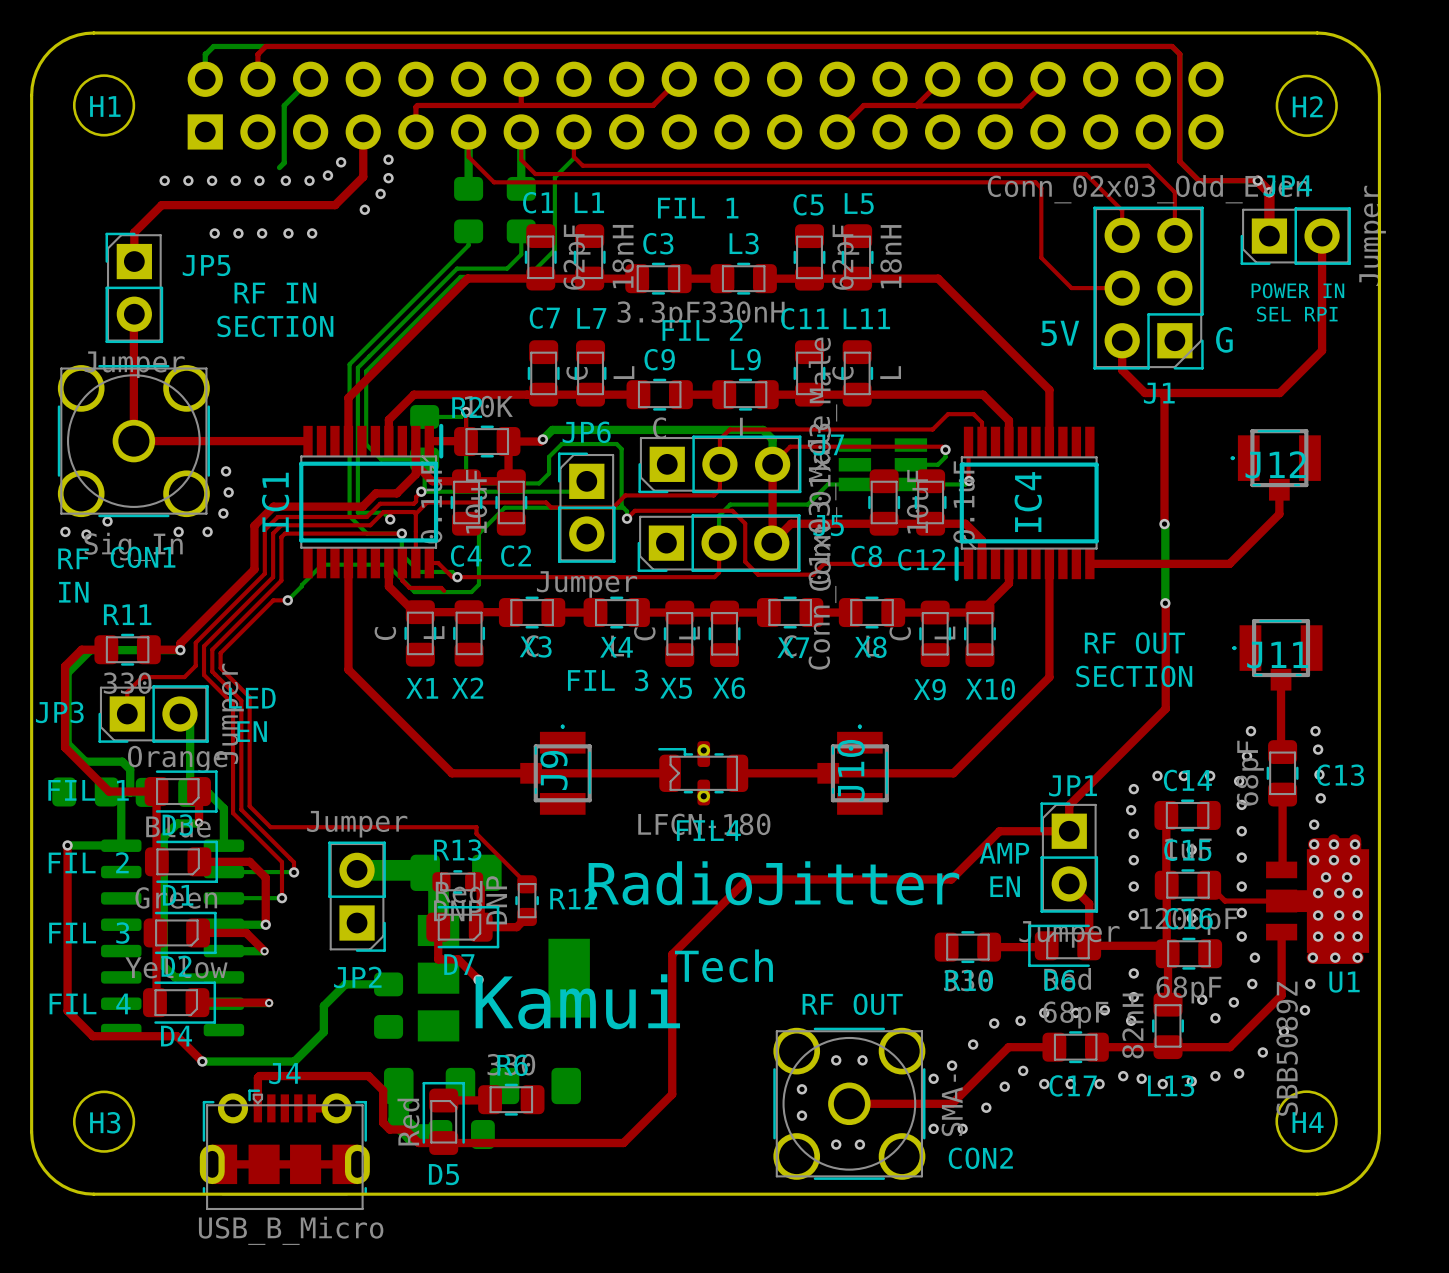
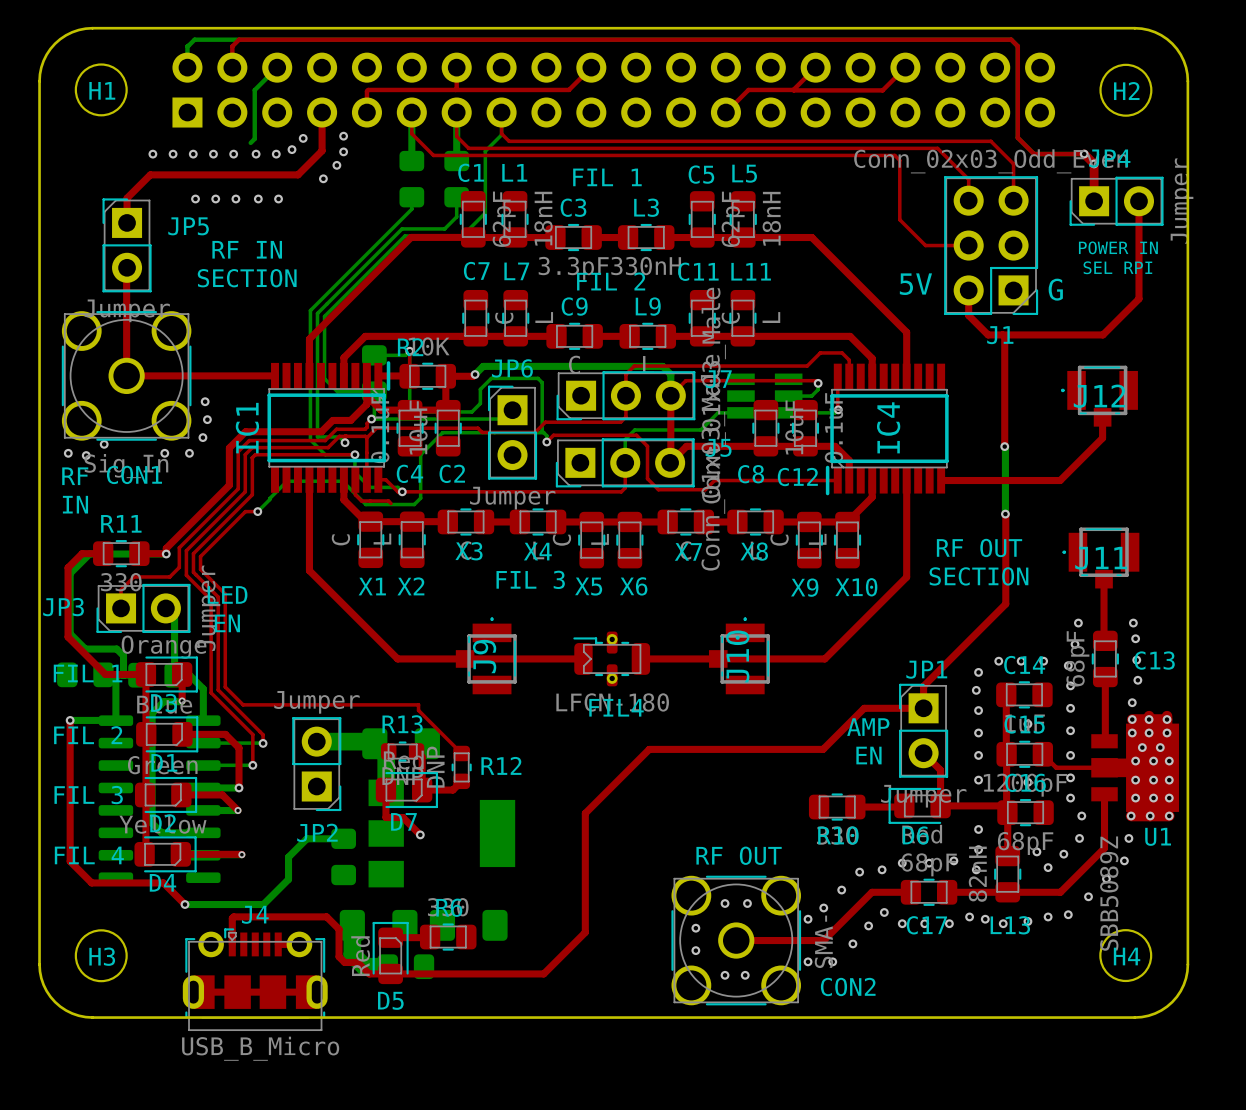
text: RadioJitter (773, 883) -> none
text: Tech (723, 965) -> none
text: Kamui (577, 1001) -> none

